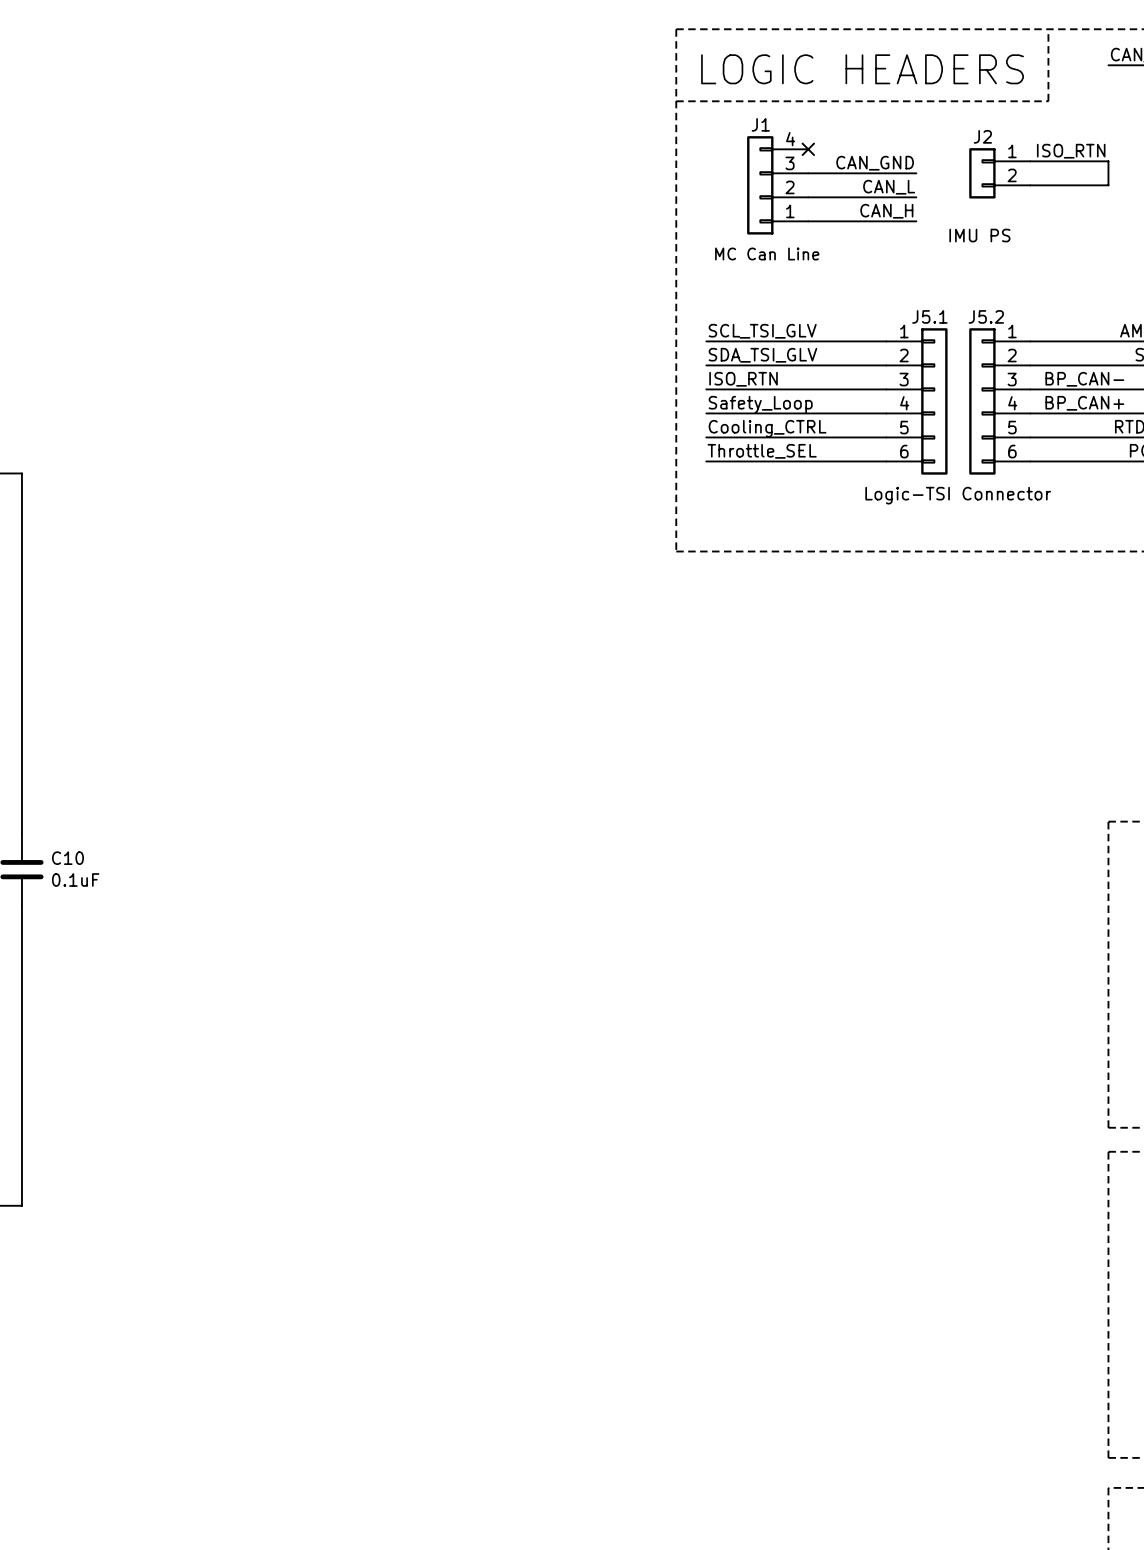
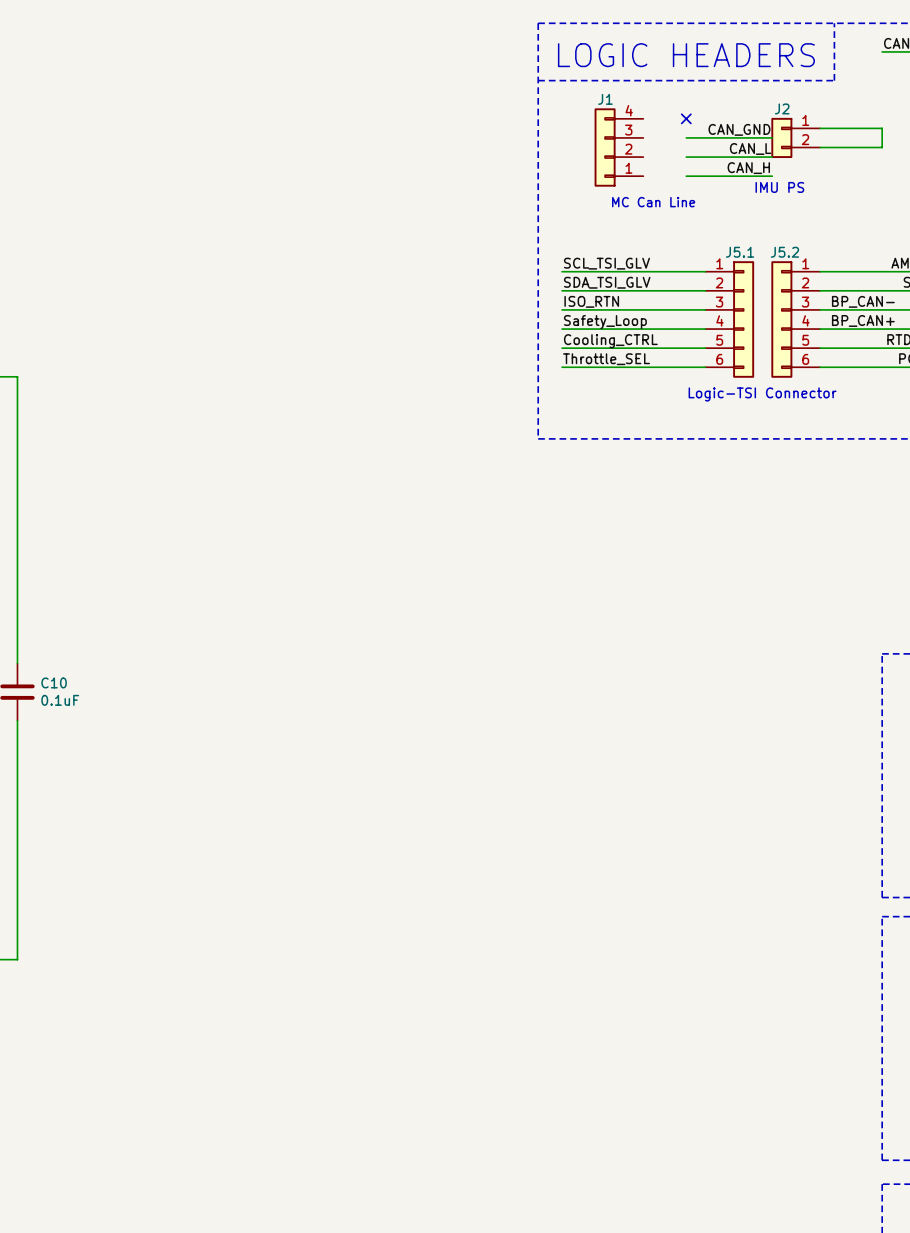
no-connect mark position: (808, 149) -> (686, 118)
label: ISO_RTN (1071, 151) -> none
label position: CAN_GND (875, 163) -> CAN_GND (739, 129)
wire: (808, 173) (862, 173) -> (729, 137) (772, 137)
label position: CAN_L (889, 187) -> CAN_L (750, 148)
wire: (808, 197) (862, 197) -> (729, 157) (772, 157)
label position: CAN_H (886, 211) -> CAN_H (748, 168)
wire: (808, 221) (862, 221) -> (729, 176) (772, 176)
text position: MC Can Line (767, 253) -> MC Can Line (653, 202)

